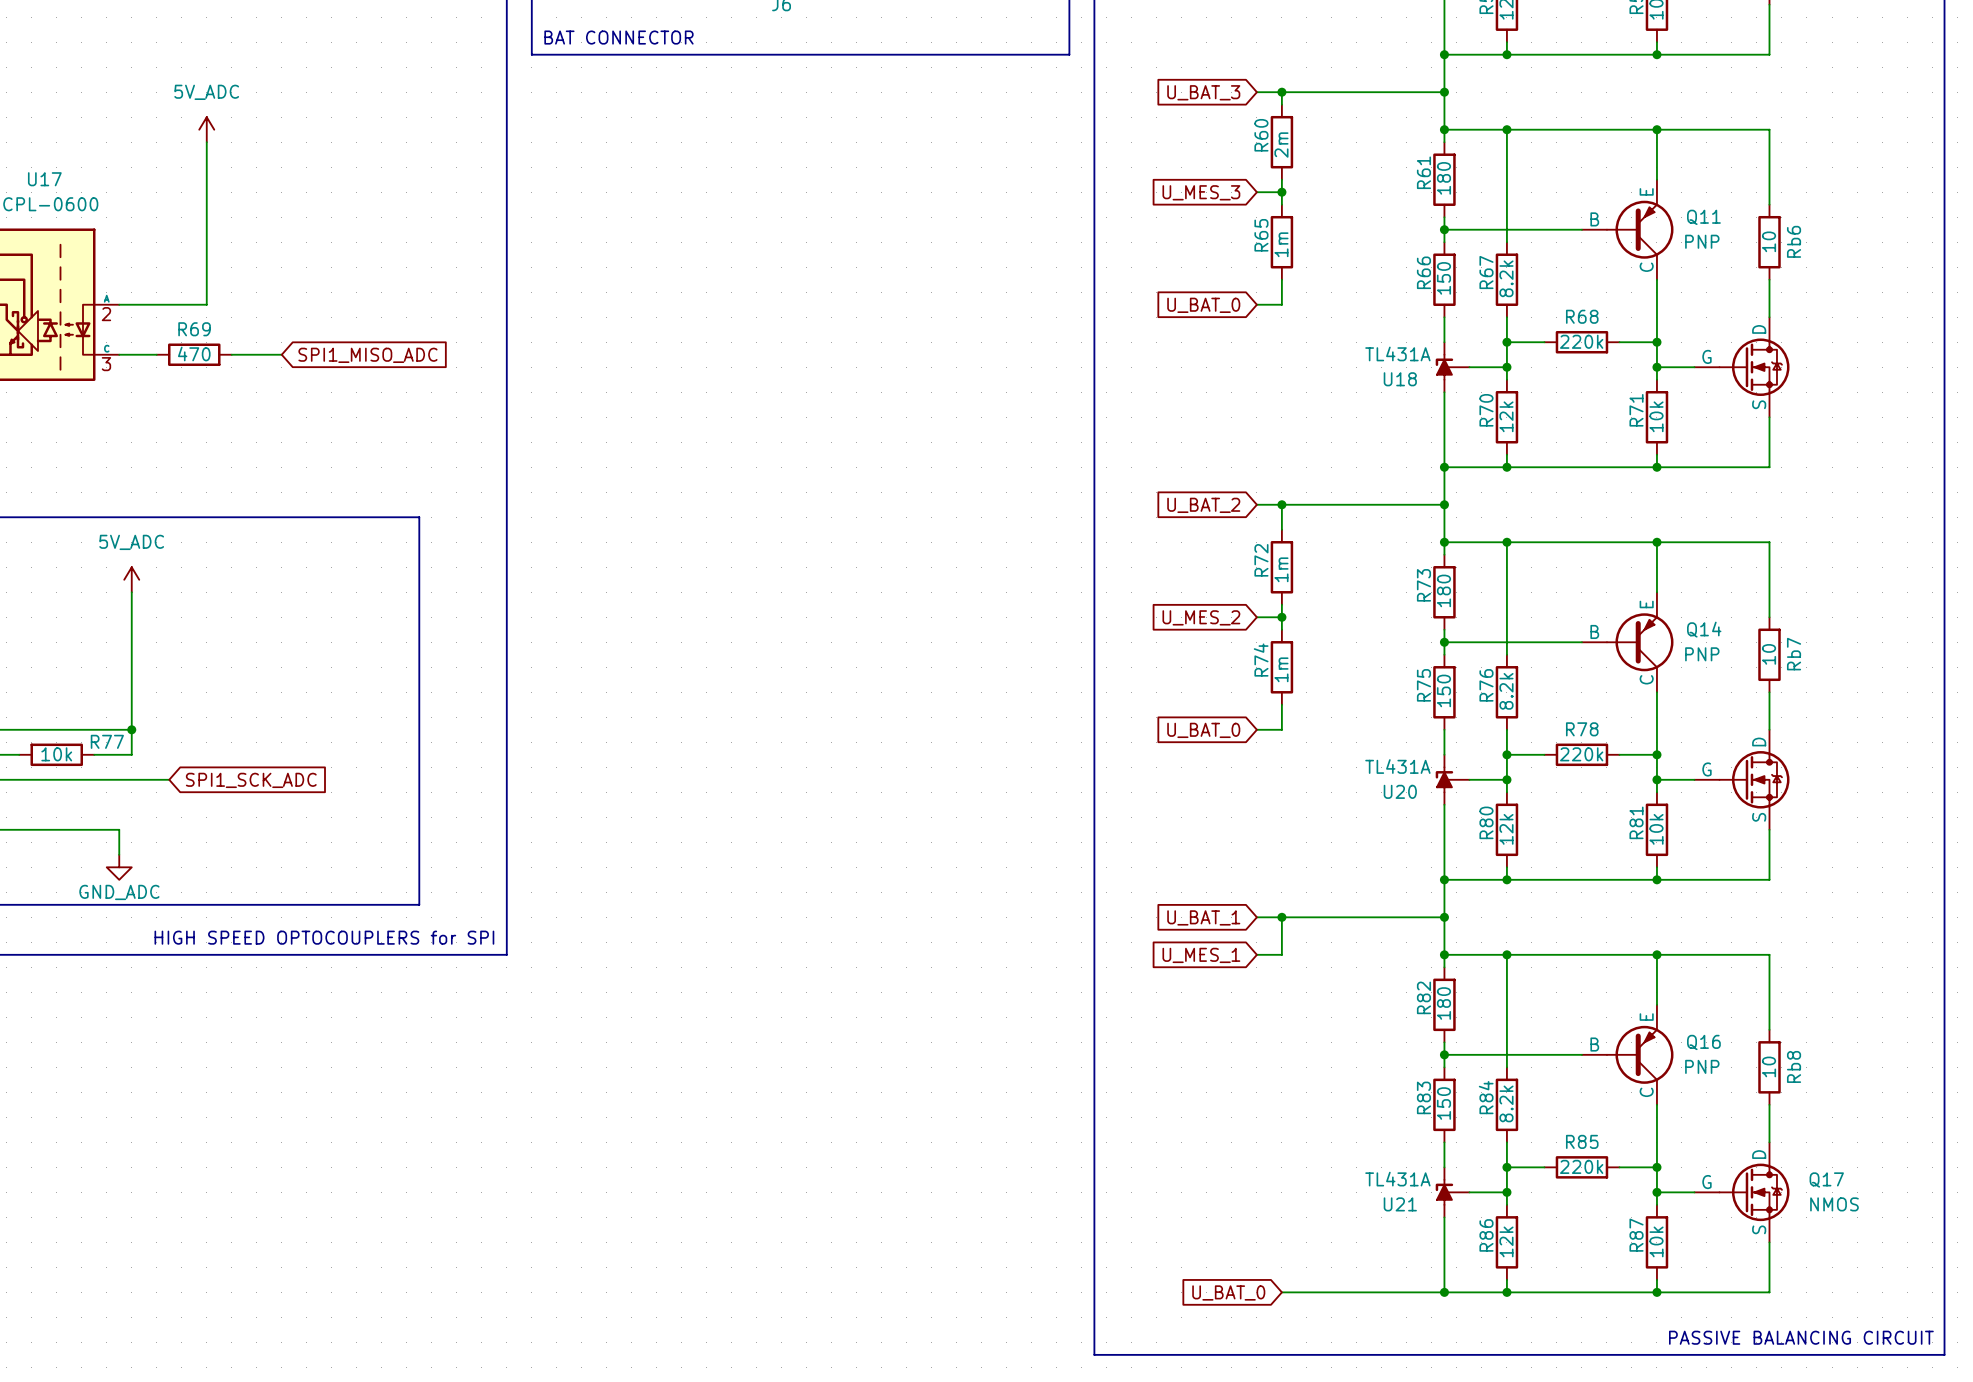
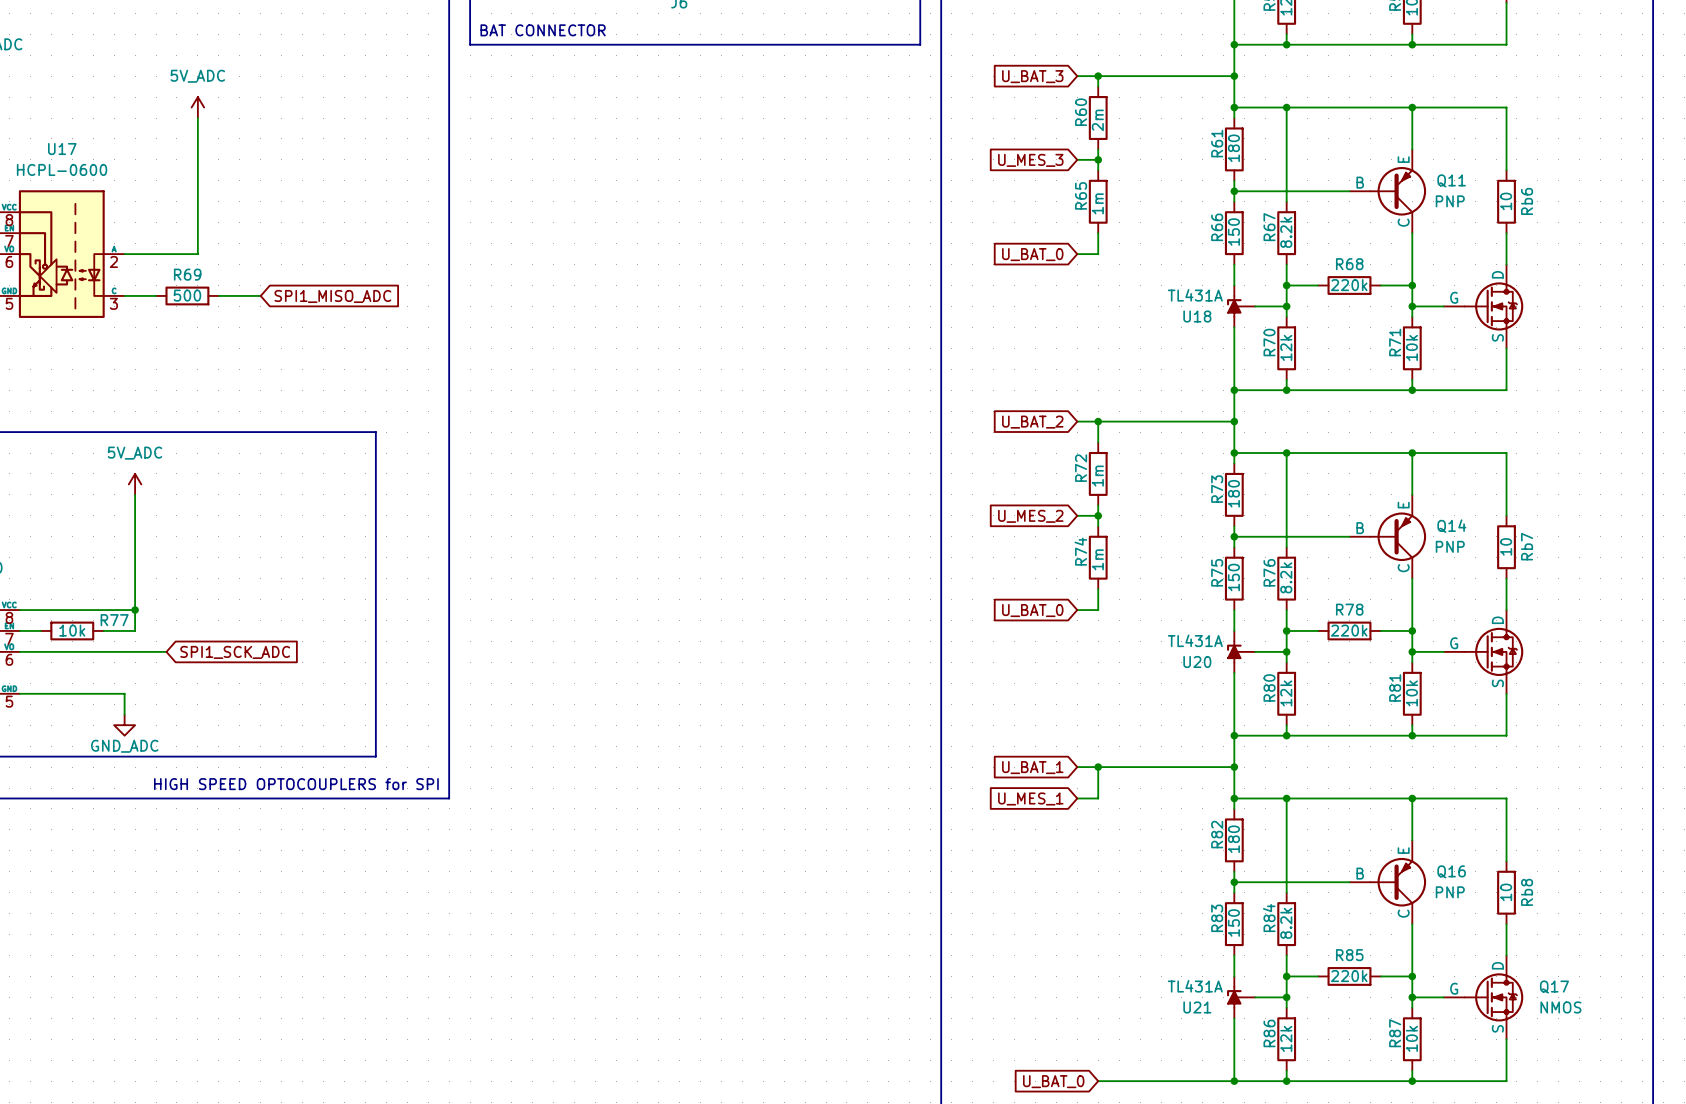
R69 value: 470 (194, 353) -> 500 (187, 295)

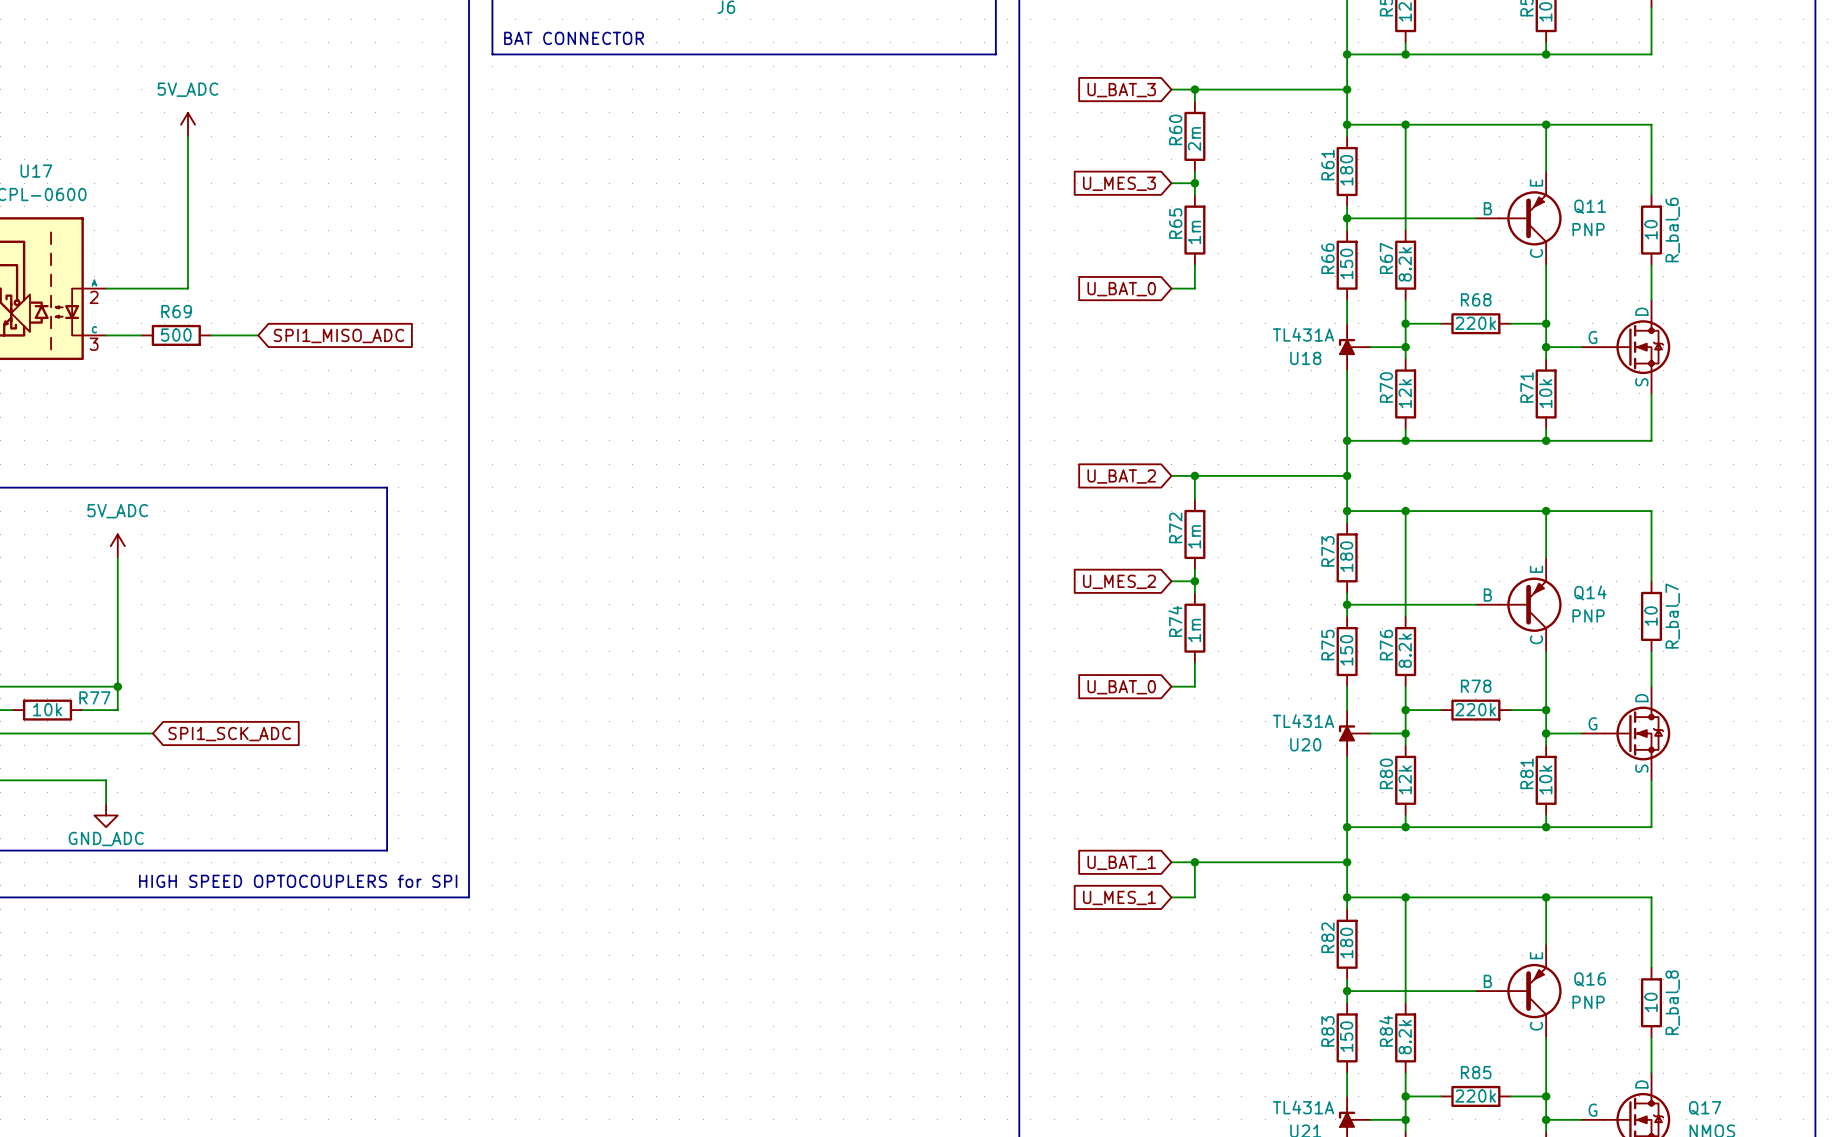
Rb6 name: Rb6 (1527, 201) -> R_bal_6 (1672, 229)
Rb7 name: Rb7 (1527, 546) -> R_bal_7 (1672, 616)
Rb8 name: Rb8 (1527, 892) -> R_bal_8 (1672, 1002)

